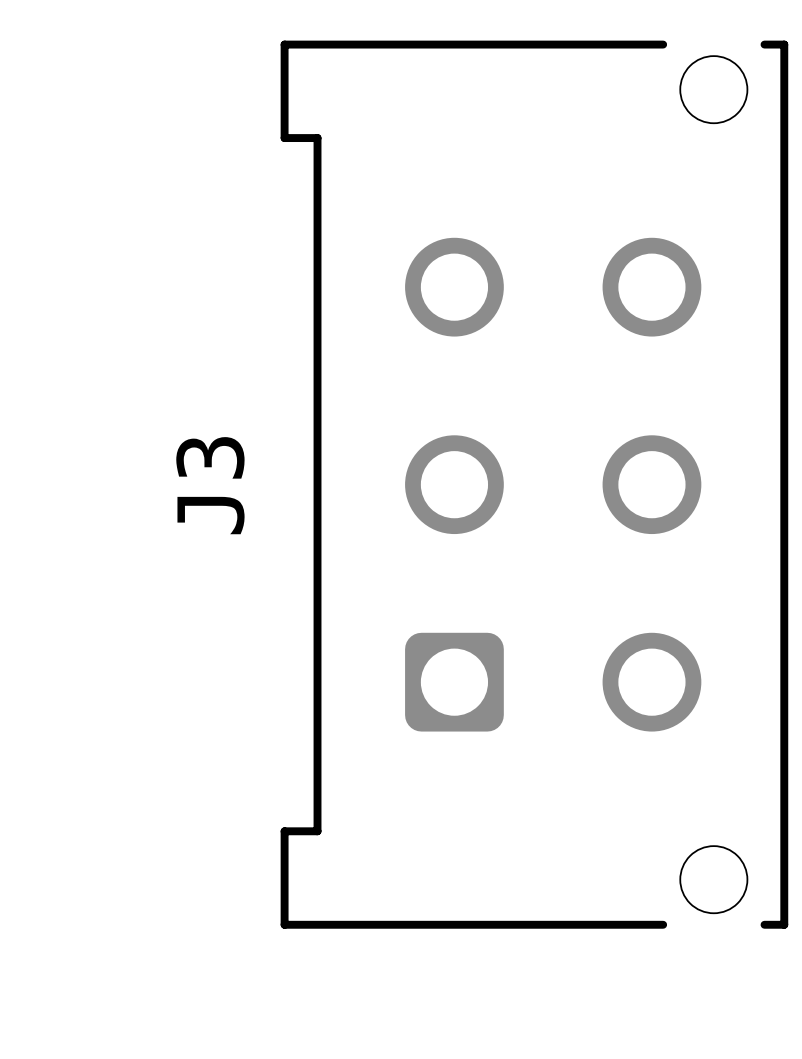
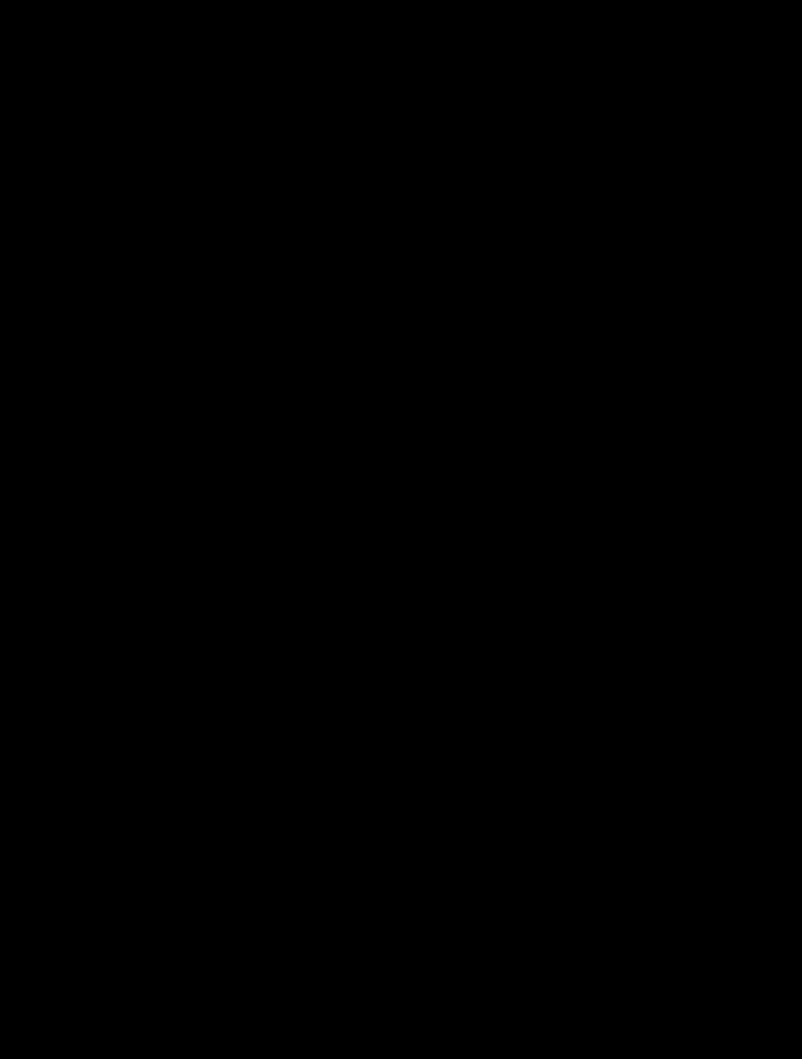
J3: (534, 484) -> none

